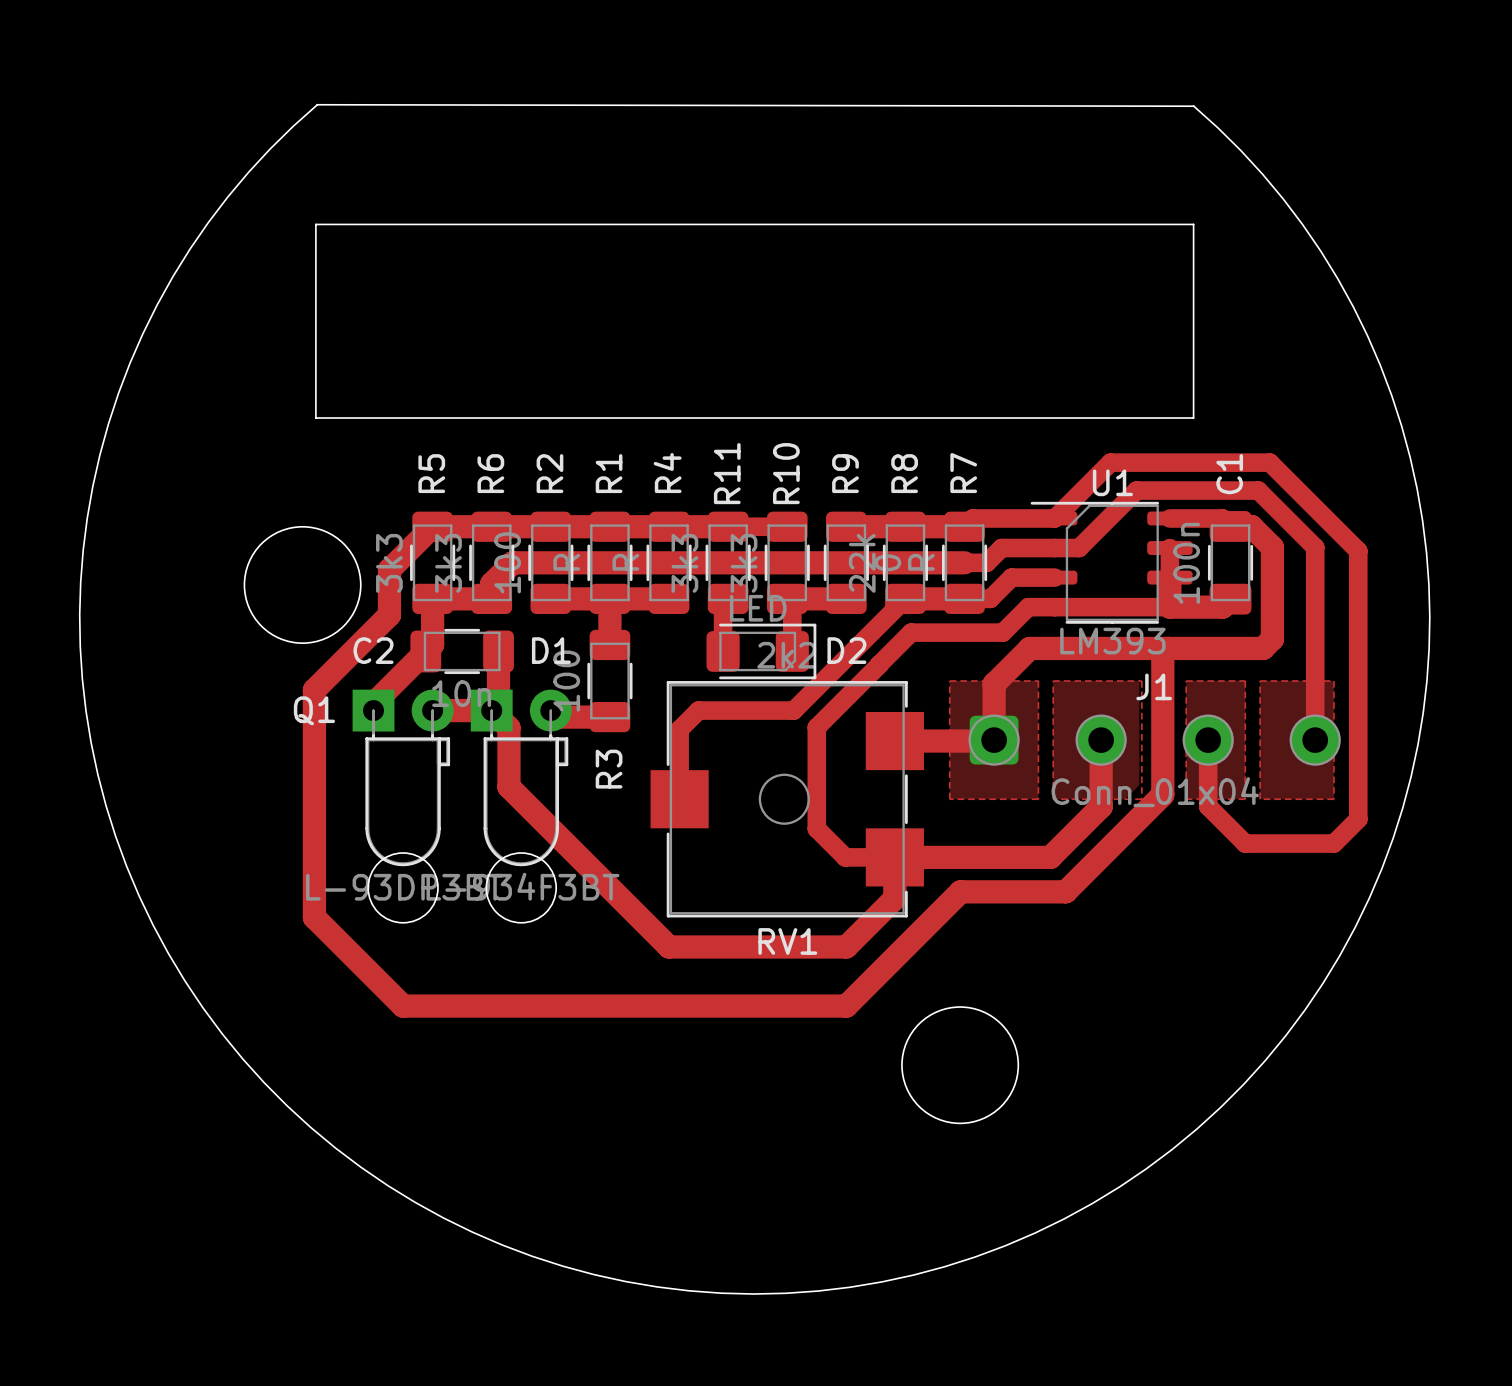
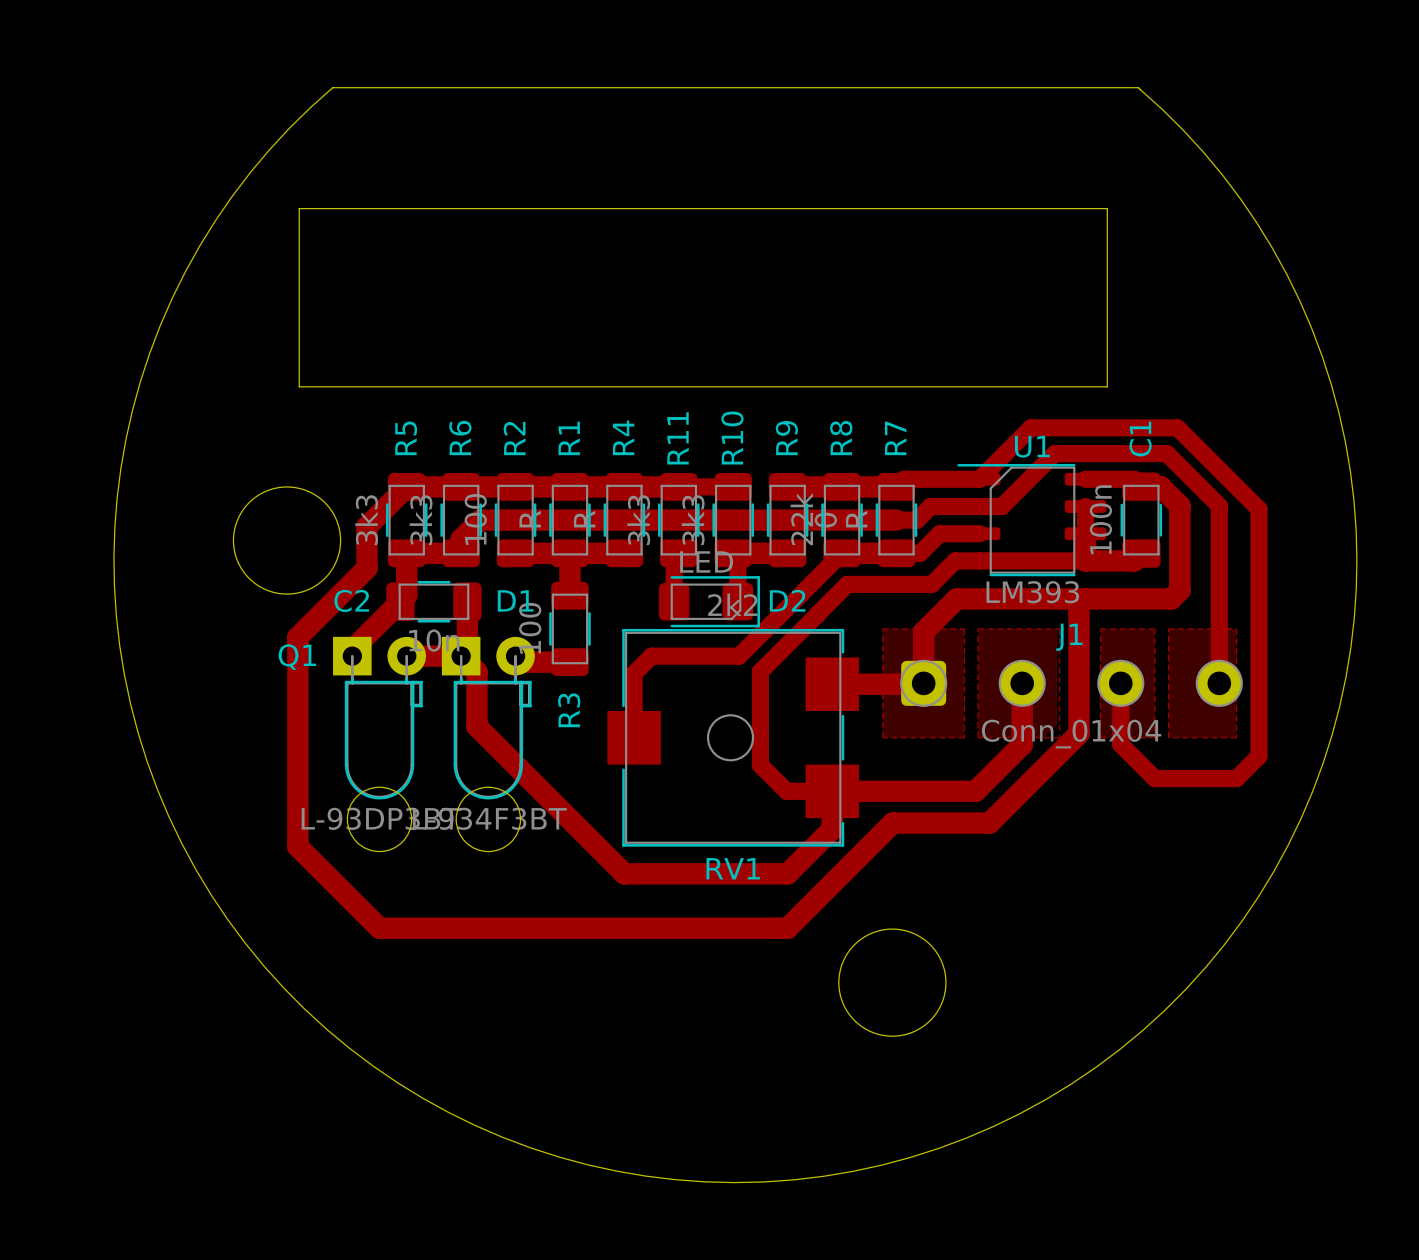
board edge: (317, 104) (1193, 106) (1240, 150) (1262, 174) (1302, 224) (1337, 278) (1353, 306) (1380, 365) (1401, 426) (1417, 488) (1426, 552) (1429, 616) (1426, 681) (1417, 744) (1402, 807) (1381, 868) (1355, 927) (1323, 983) (1285, 1035) (1243, 1084) (1197, 1128) (1146, 1168) (1092, 1203) (1034, 1233) (975, 1257) (913, 1275) (850, 1287) (785, 1293) (721, 1293) (657, 1286) (594, 1274) (532, 1256) (502, 1244) (443, 1218) (387, 1185) (335, 1148) (286, 1105) (242, 1058) (203, 1007) (168, 953) (139, 896) (115, 836) (97, 774) (85, 710) (80, 646) (80, 582) (87, 518) (92, 486) (108, 423) (129, 363) (157, 304) (189, 249) (227, 197) (270, 148) (317, 104) -> (332, 87) (289, 128) (250, 172) (215, 220) (185, 271) (149, 353) (132, 410) (120, 468) (114, 527) (114, 586) (119, 645) (130, 704) (146, 761) (168, 816) (195, 869) (227, 919) (263, 965) (304, 1009) (349, 1048) (397, 1082) (448, 1112) (502, 1137) (558, 1156) (616, 1171) (674, 1179) (734, 1182) (793, 1179) (852, 1171) (909, 1157) (965, 1138) (1045, 1099) (1095, 1067) (1142, 1030) (1185, 989) (1224, 944) (1258, 896) (1288, 845) (1312, 791) (1332, 735) (1345, 677) (1356, 589) (1356, 529) (1350, 470) (1338, 412) (1322, 355) (1299, 300) (1272, 248) (1240, 198) (1203, 151) (1138, 87) (332, 87)

